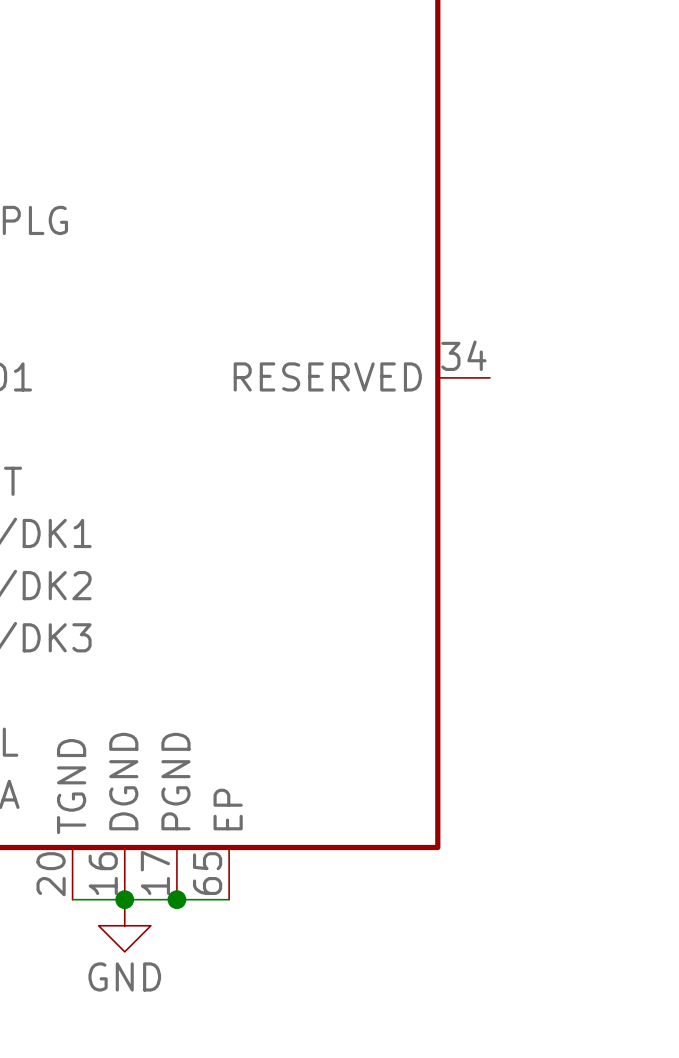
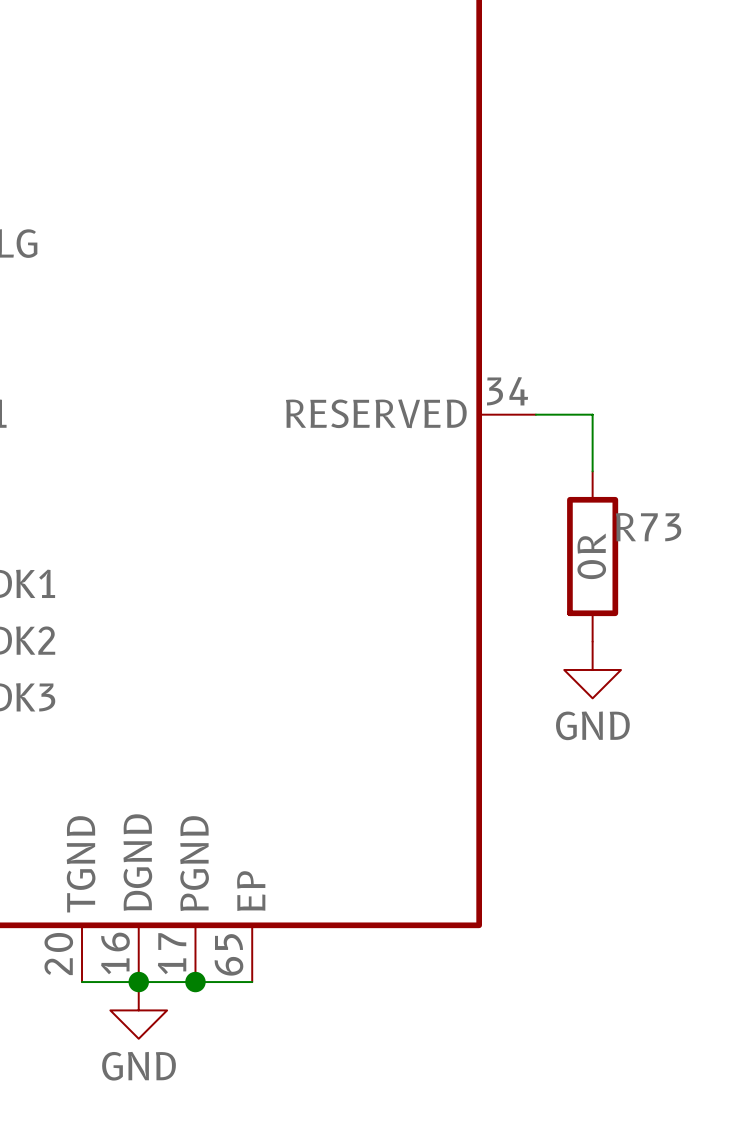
wire: none -> (535, 414) (592, 414) (592, 471)
R73: none -> 0R (592, 556)
power symbol: none -> GND (592, 669)

